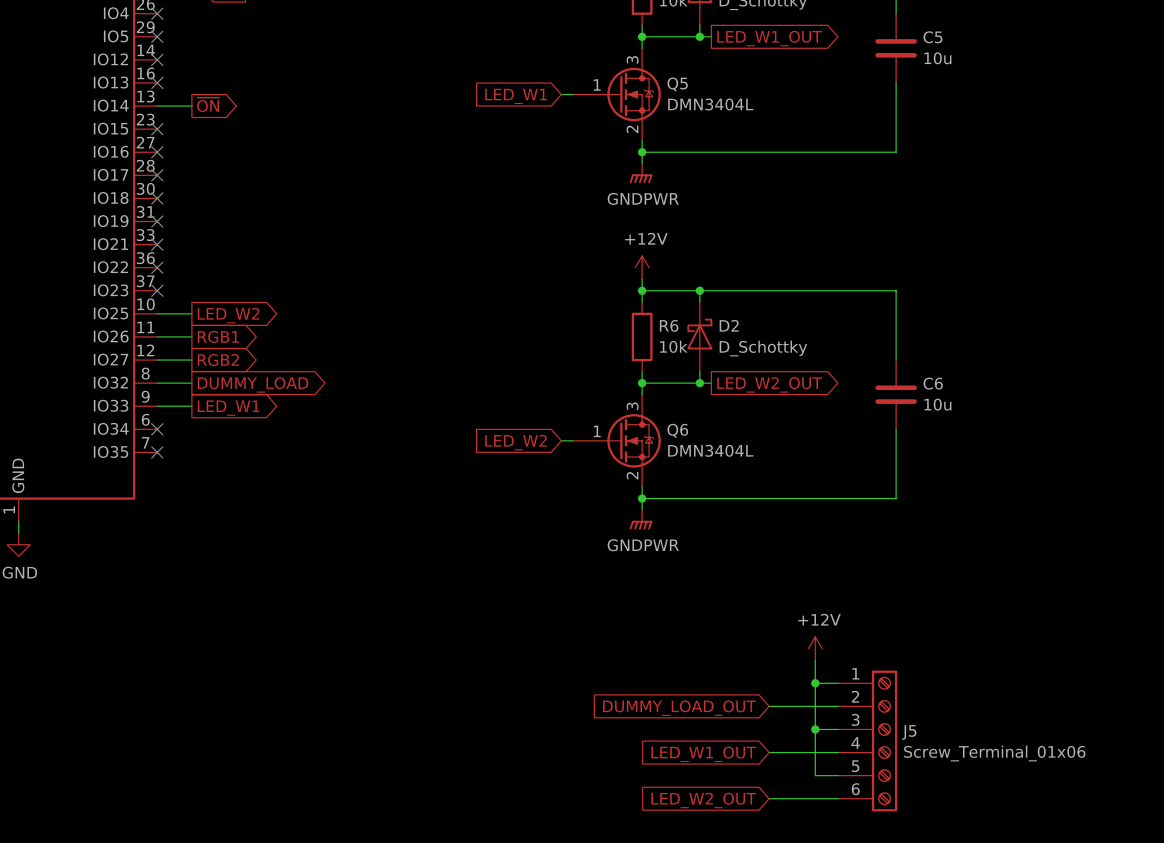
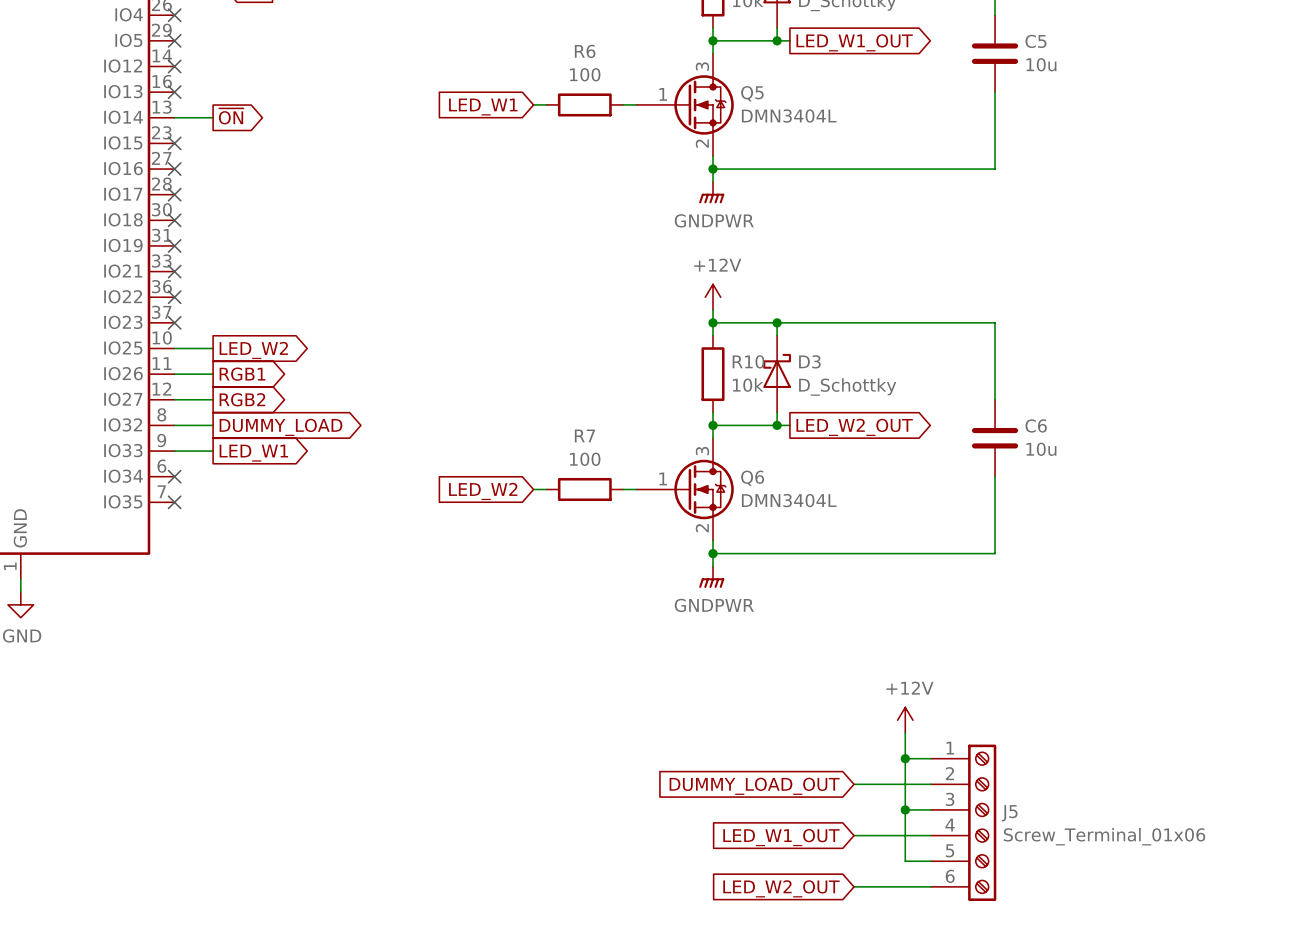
wire: none -> (533, 104) (546, 104)
R6: none -> 100 (584, 104)
global label position: LED_W1 (516, 96) -> LED_W1 (483, 107)
R6 name: R6 (669, 325) -> R10 (748, 361)
D2 name: D2 (729, 325) -> D3 (809, 361)
wire: none -> (533, 489) (546, 489)
R7: none -> 100 (584, 489)
global label position: LED_W2 (515, 442) -> LED_W2 (483, 491)

